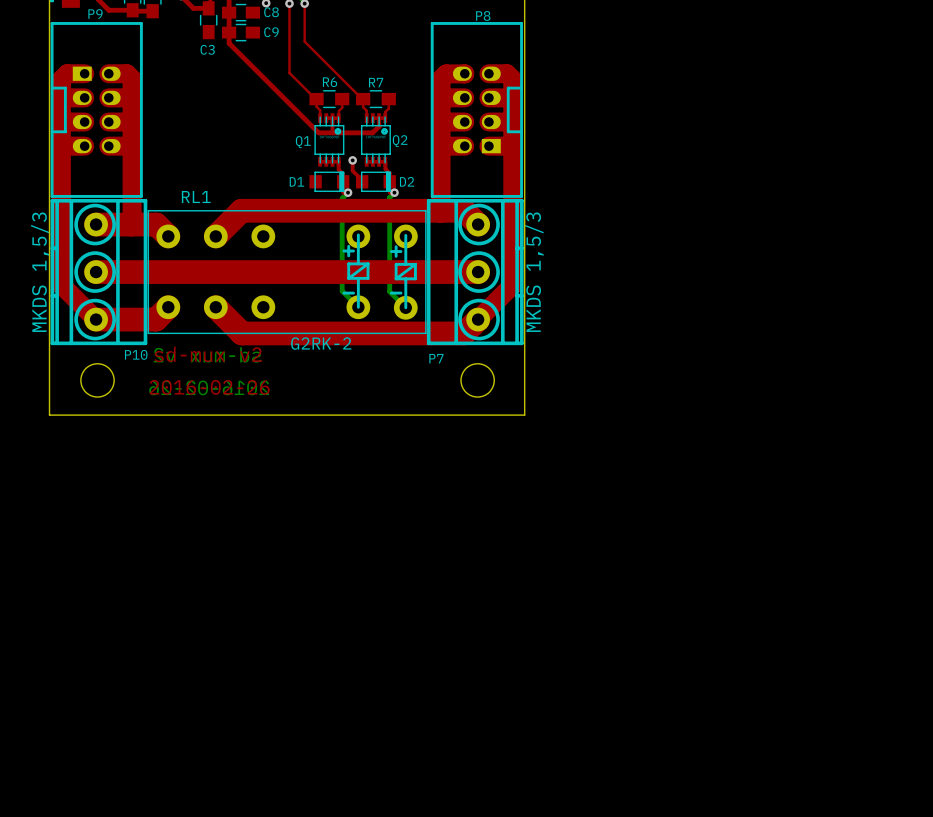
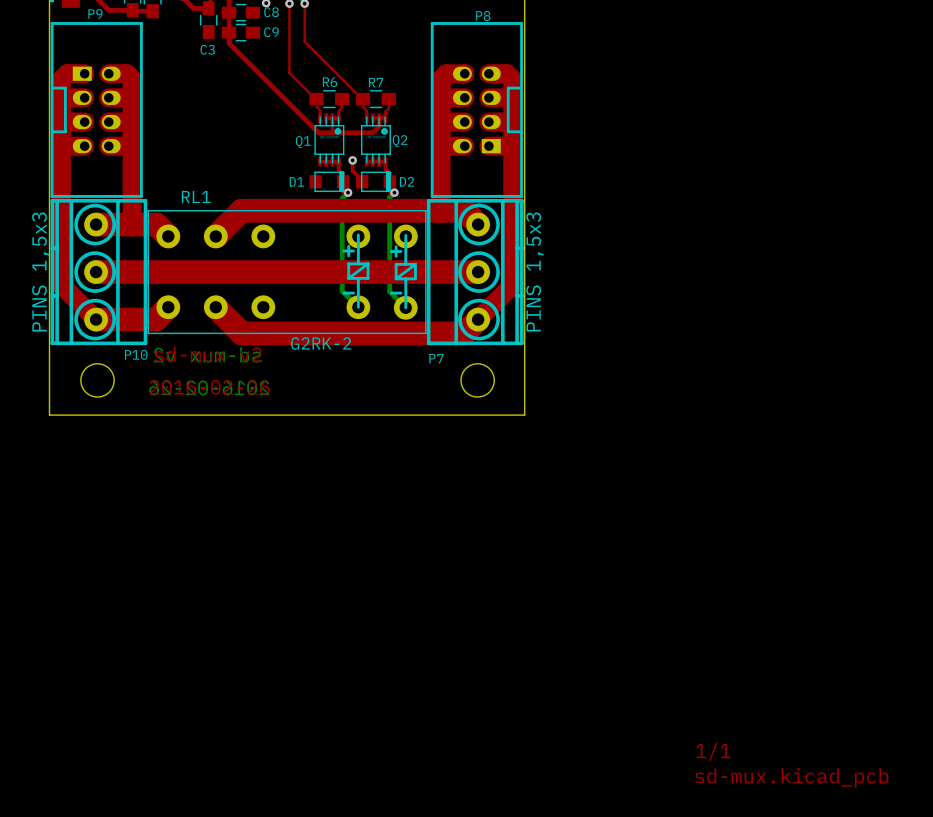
P10 value: MKDS 1,5/3 (40, 272) -> PINS 1,5x3 (40, 271)
P7 value: MKDS 1,5/3 (534, 272) -> PINS 1,5x3 (534, 271)
text: none -> 1/1 (713, 751)
text: none -> sd-mux.kicad_pcb (791, 777)

